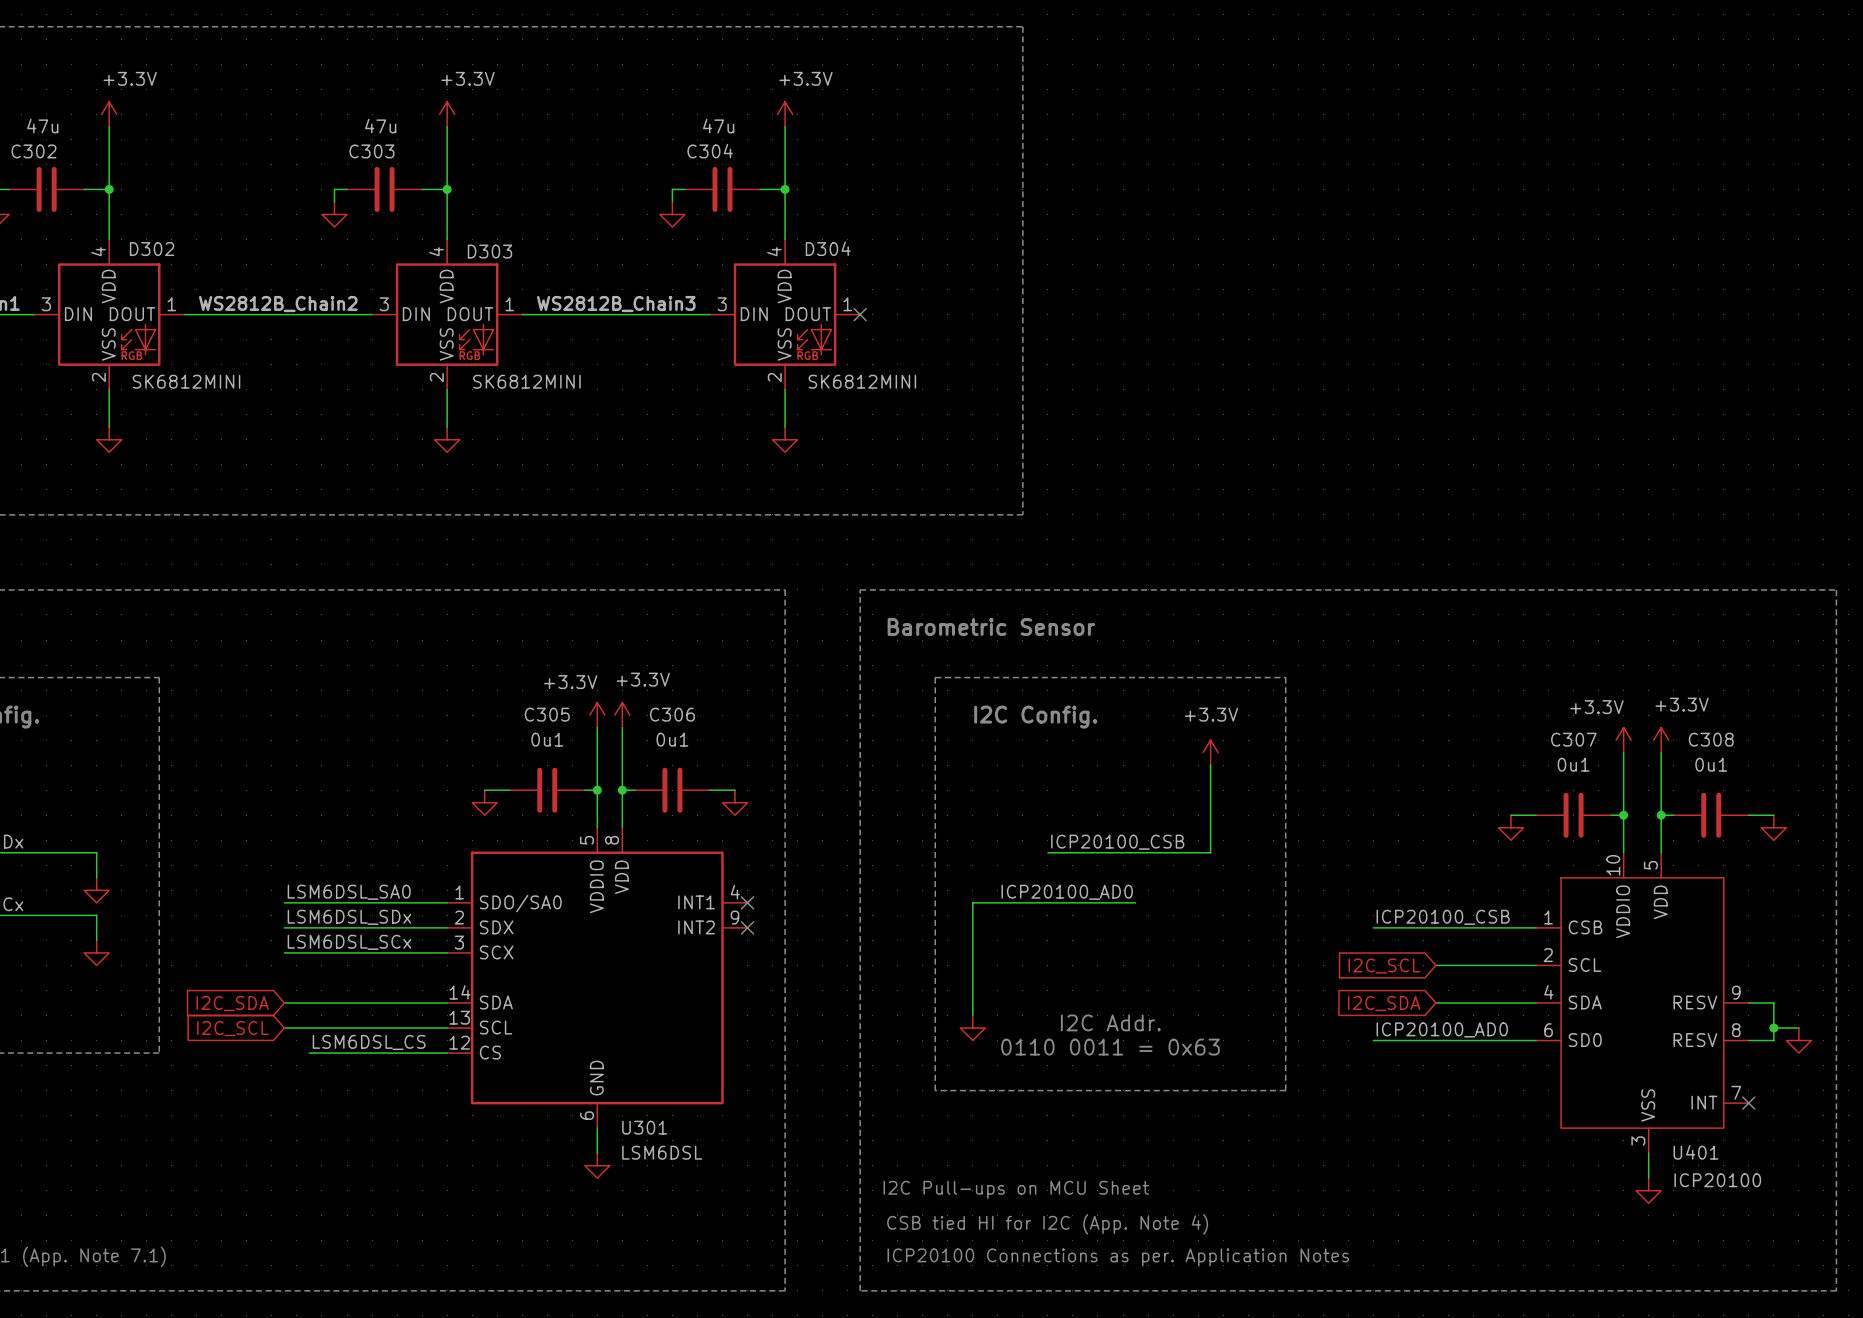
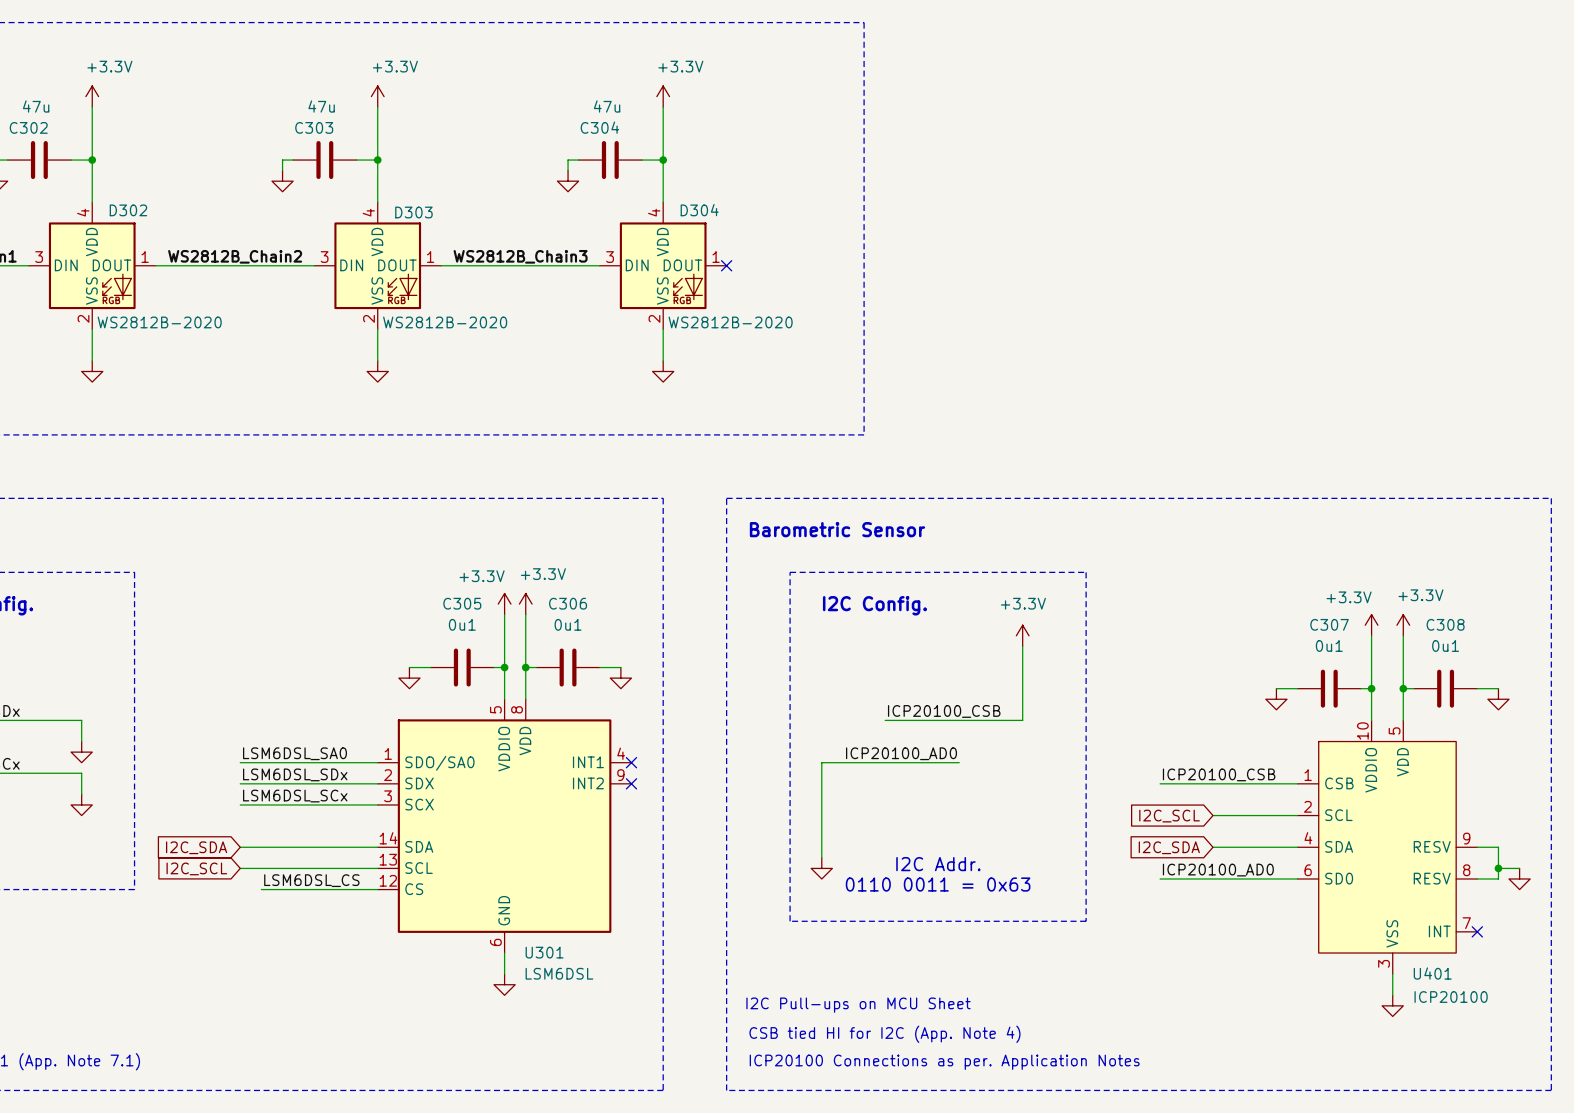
D302 value: SK6812MINI (186, 381) -> WS2812B-2020 (159, 322)
D303 value: SK6812MINI (526, 381) -> WS2812B-2020 (445, 322)
D304 value: SK6812MINI (862, 381) -> WS2812B-2020 (730, 322)

